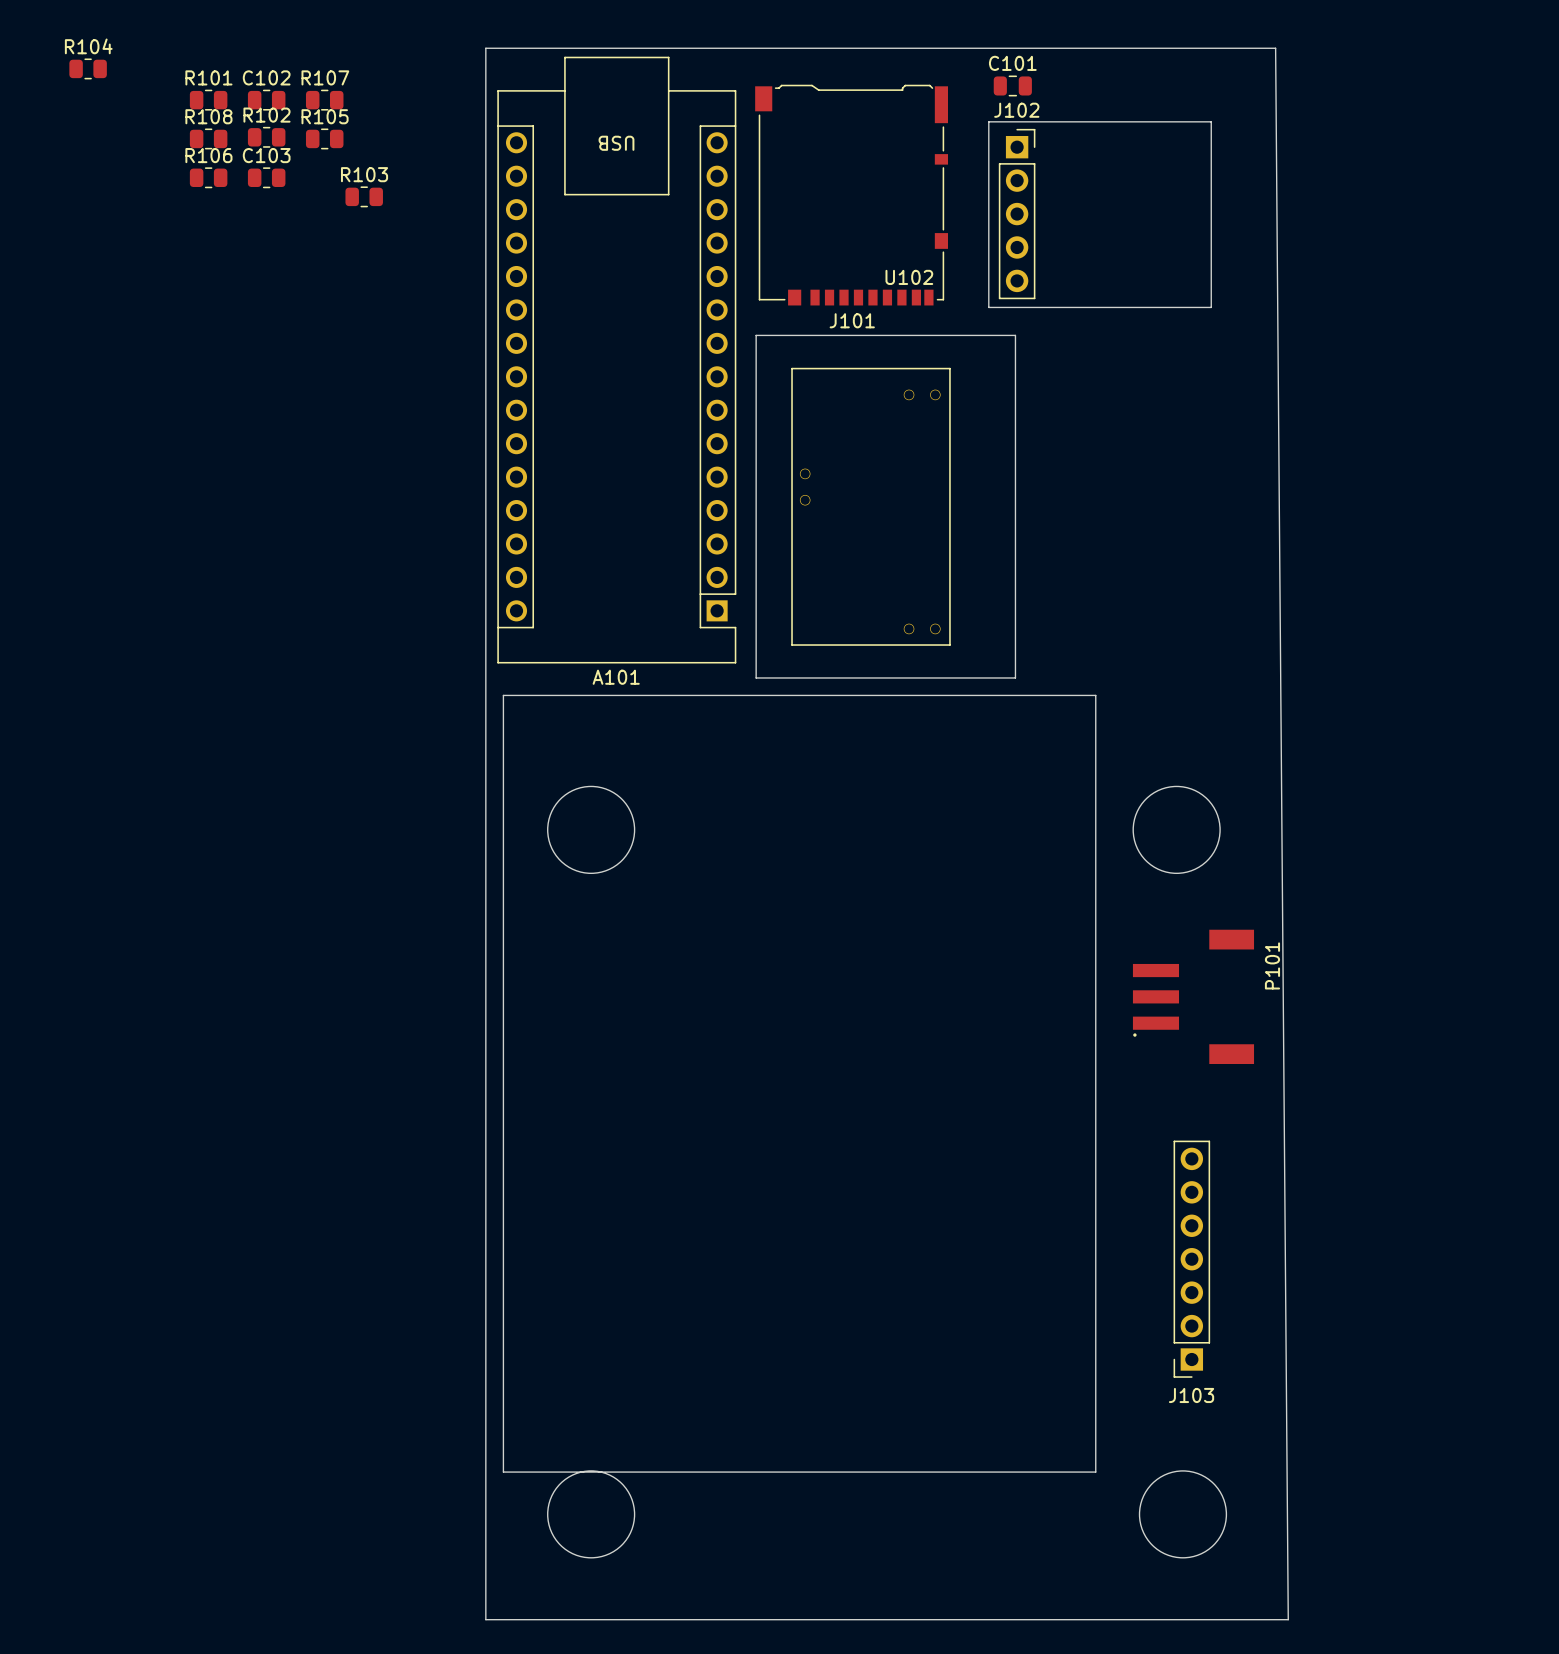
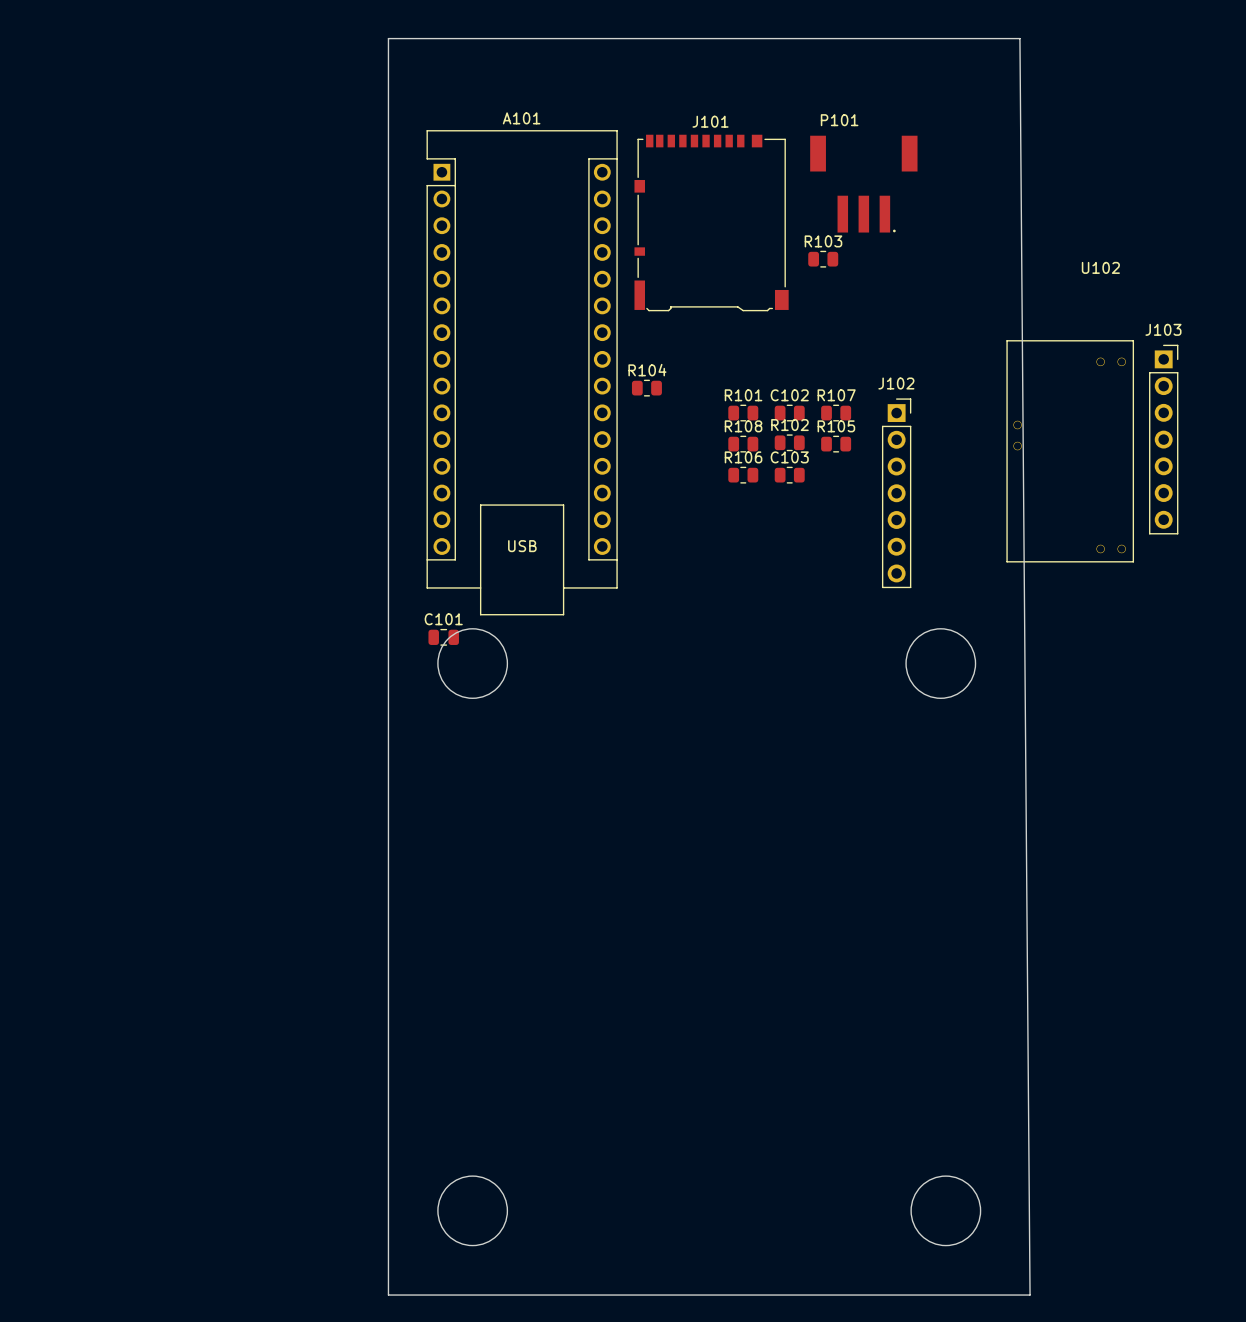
R104 position: (88, 68) -> (646, 388)
C101 position: (1012, 85) -> (443, 637)
R101 position: (208, 100) -> (743, 413)
C102 position: (266, 100) -> (789, 413)
R107 position: (324, 100) -> (836, 413)
J102 name position: J102 (1016, 110) -> J102 (896, 383)
board edge: (988, 121) (1211, 121) (1211, 307) (988, 307) (988, 121) -> none
J102 footprint: [998, 128, 1036, 300] -> [882, 398, 912, 589]
R102 position: (266, 137) -> (789, 442)
R108 position: (208, 138) -> (743, 444)
R105 position: (324, 138) -> (836, 444)
R106 position: (208, 177) -> (743, 475)
C103 position: (266, 177) -> (789, 475)
J101 rotation: 0° (851, 195) -> 180° (711, 222)
R103 position: (364, 196) -> (823, 259)
board edge: (756, 335) (1015, 335) (1015, 677) (756, 677) (756, 335) -> none
A101 rotation: 0° (616, 360) -> 180° (522, 372)
U102 position: (870, 506) -> (1070, 451)
board edge: (503, 695) (1095, 695) (1095, 1472) (503, 1472) (503, 695) -> none
P101 rotation: 0° (1193, 996) -> 90° counterclockwise (863, 184)
P101 position: (1193, 996) -> (863, 184)
J103 rotation: 0° (1191, 1259) -> 180° (1163, 439)
J103 position: (1191, 1259) -> (1163, 439)

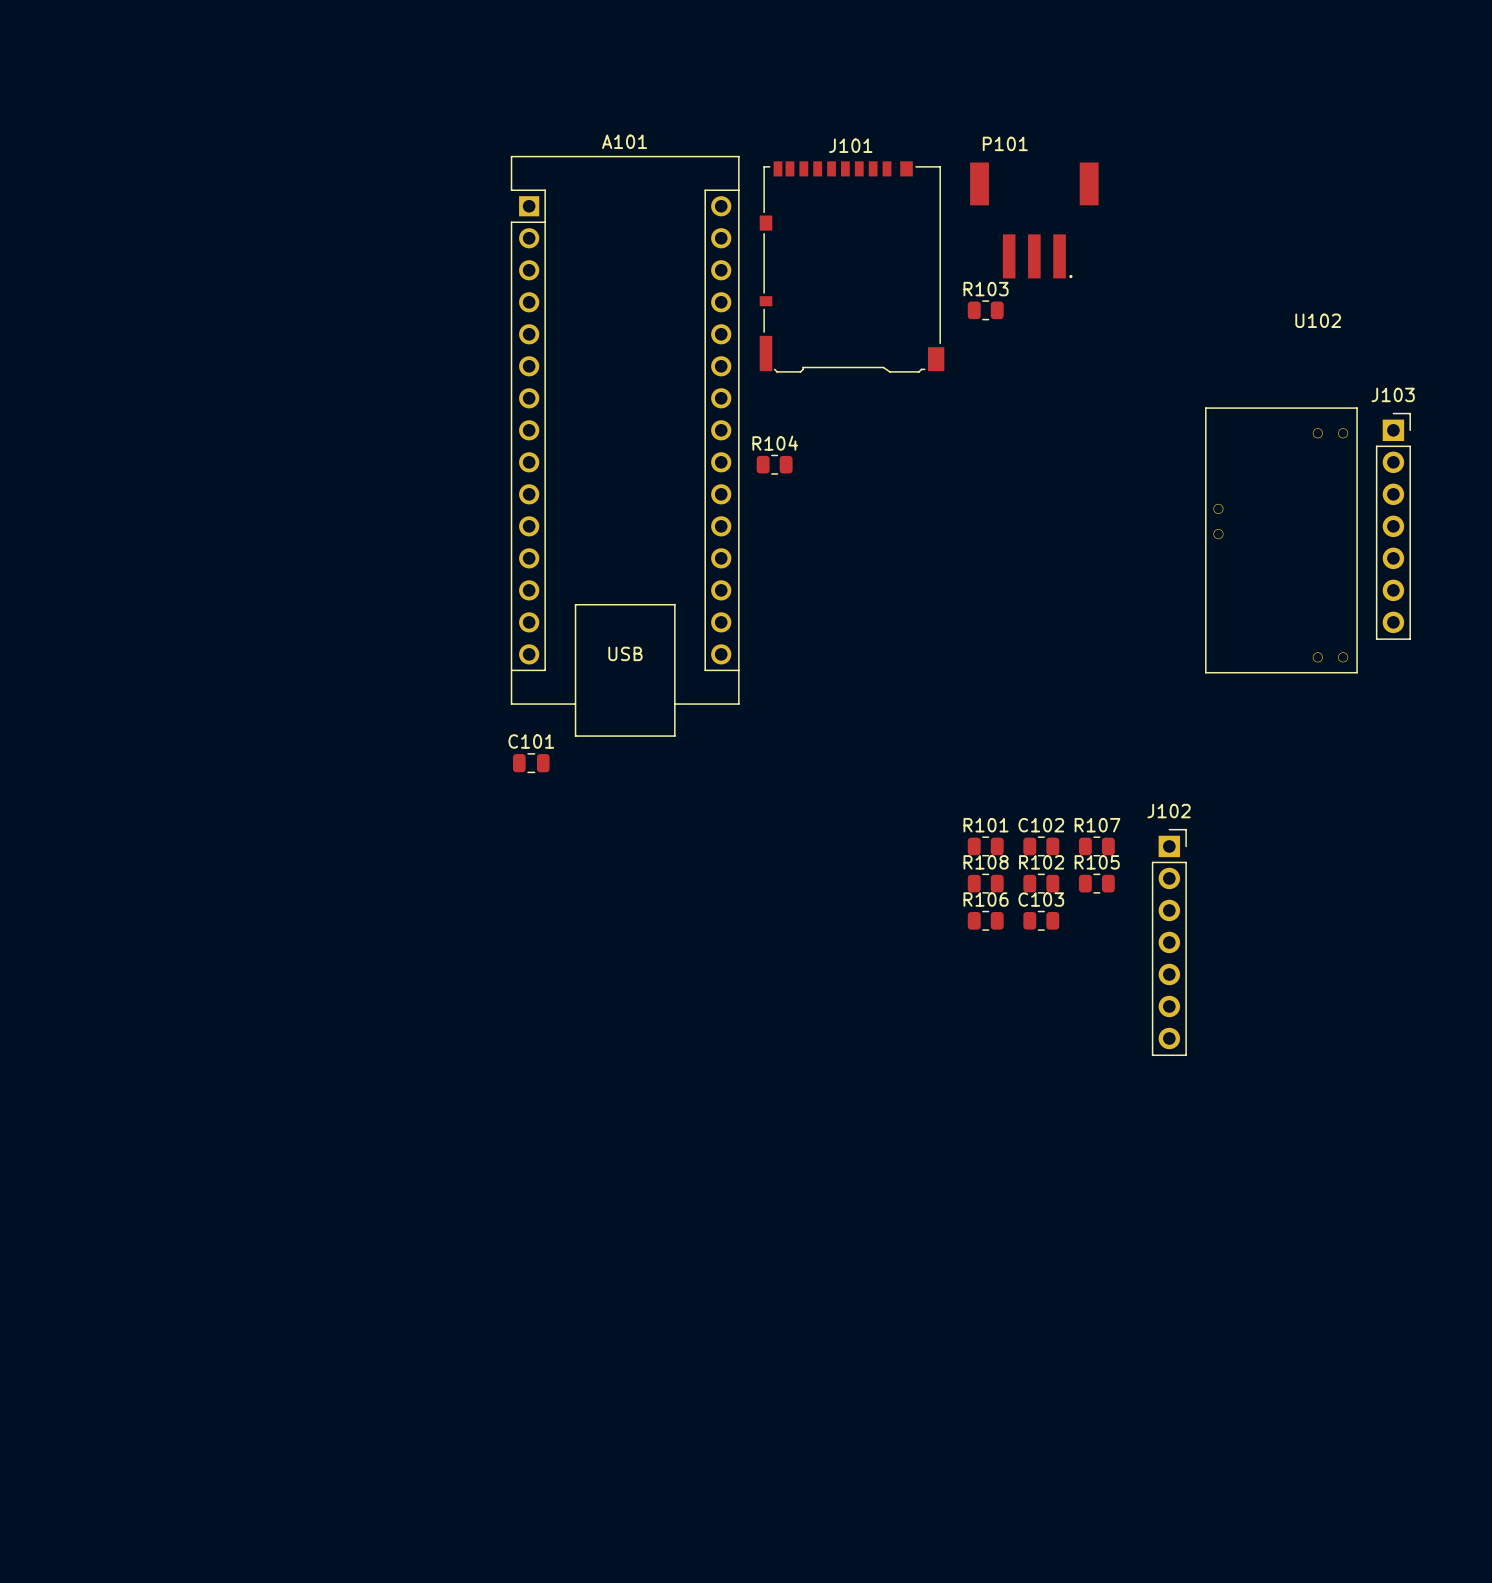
board edge: (388, 38) (388, 1295) (1030, 1295) (1019, 38) (388, 38) -> none
R101 position: (743, 413) -> (985, 846)
C102 position: (789, 413) -> (1041, 846)
R107 position: (836, 413) -> (1096, 846)
R102 position: (789, 442) -> (1041, 883)
R108 position: (743, 444) -> (985, 883)
R105 position: (836, 444) -> (1096, 883)
R106 position: (743, 475) -> (985, 920)
C103 position: (789, 475) -> (1041, 920)
J102 position: (896, 493) -> (1169, 942)
round board edge: [437, 628, 508, 699] -> none
round board edge: [905, 628, 977, 699] -> none
round board edge: [437, 1175, 508, 1247] -> none
round board edge: [910, 1175, 982, 1247] -> none

